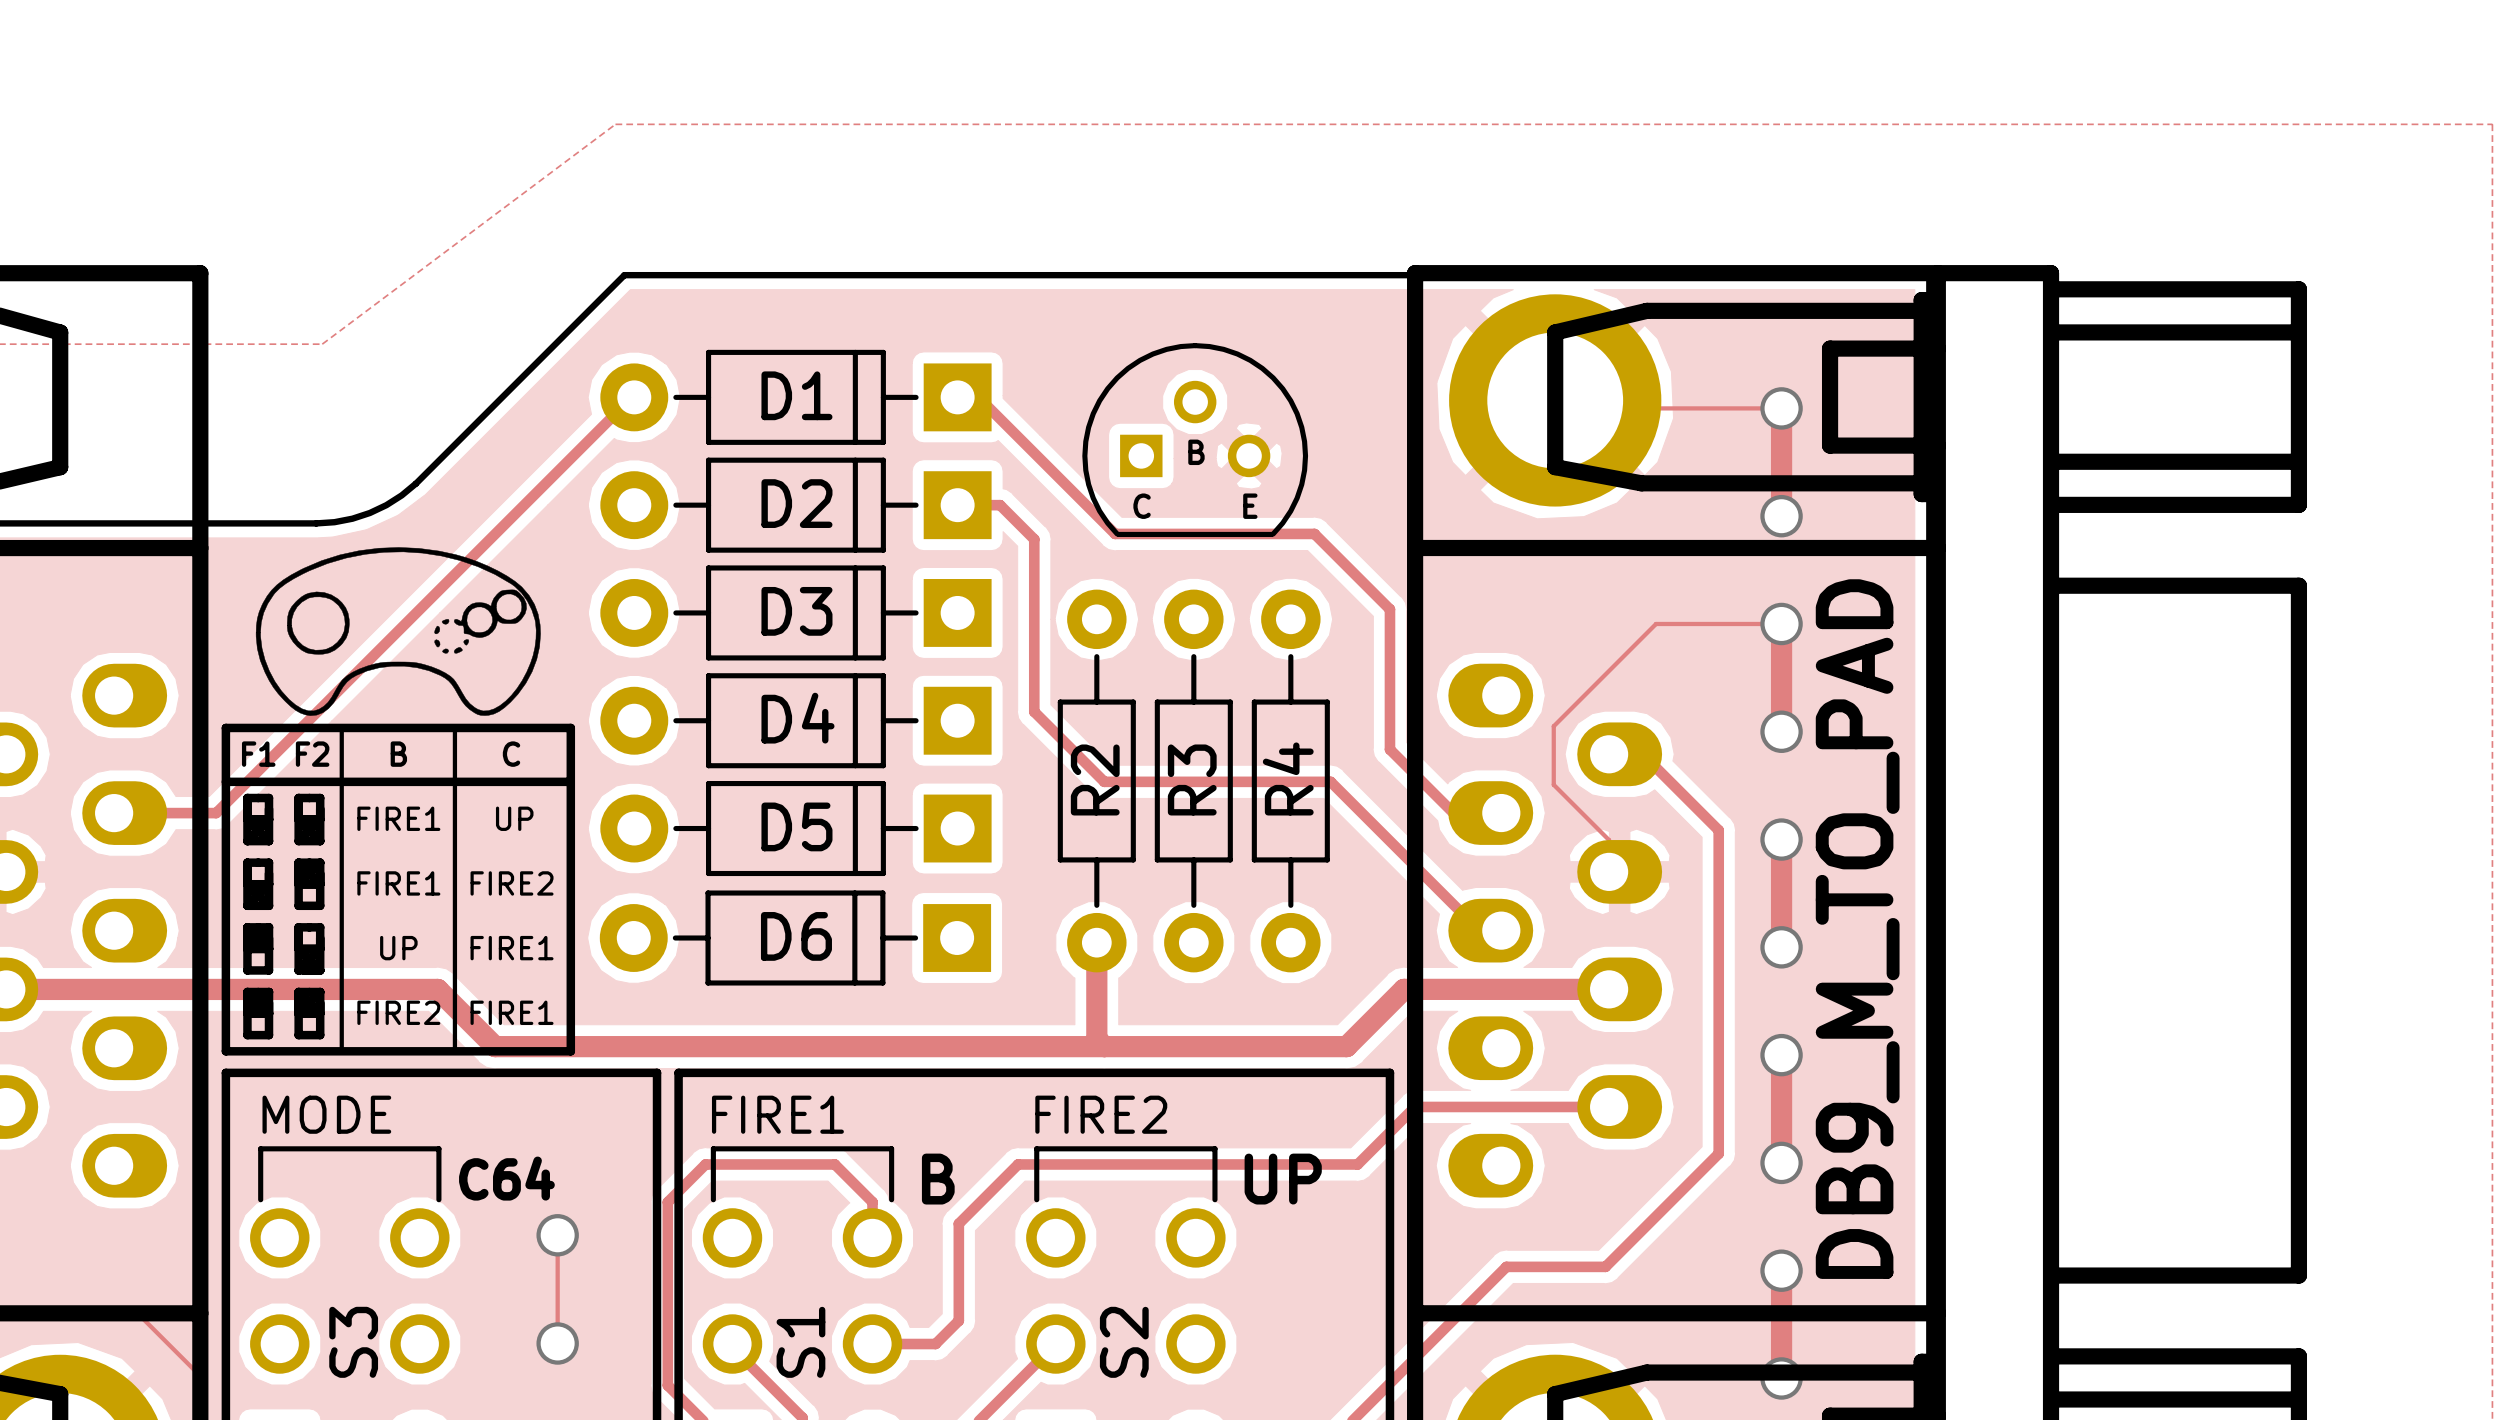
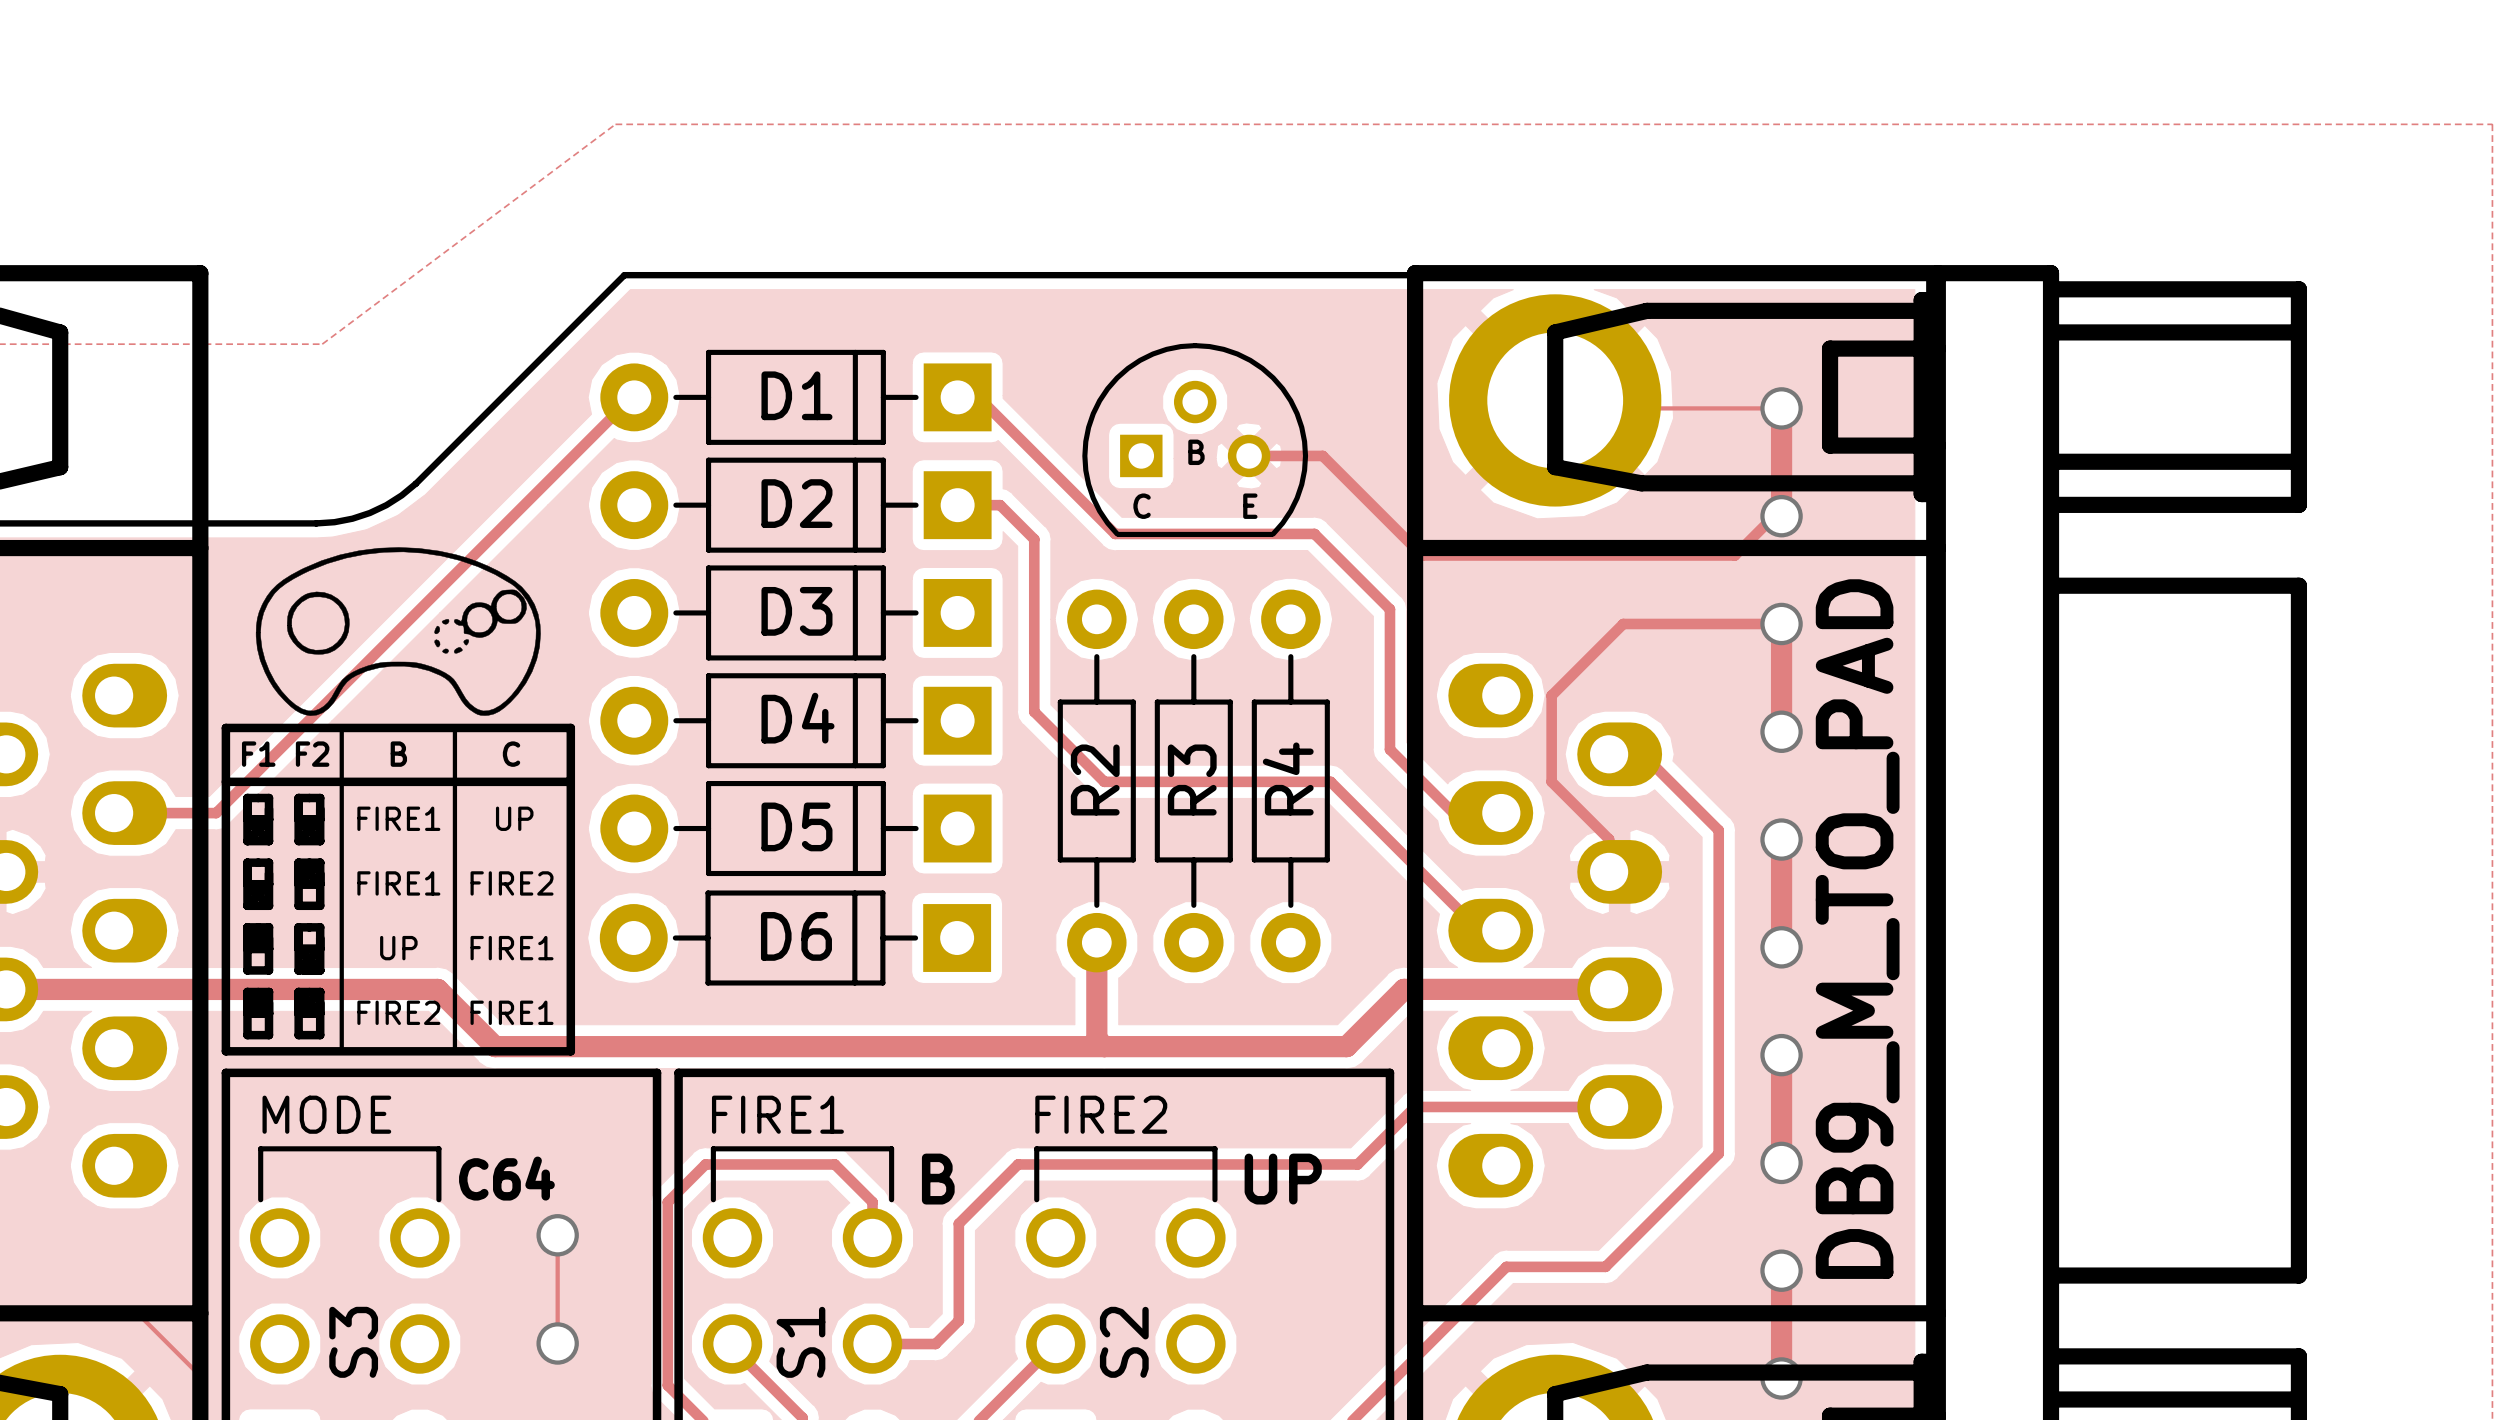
track: none -> (1249, 455) (1322, 455) (1422, 555) (1734, 555) (1774, 516) (1781, 516)
track: (1656, 623) (1553, 726) (1553, 784) (1609, 840) -> (1656, 623) (1623, 623) (1551, 695) (1551, 781) (1609, 839) (1609, 871)
track width: thin (1656, 623) (1781, 623) -> thick (1656, 623) (1781, 623)

